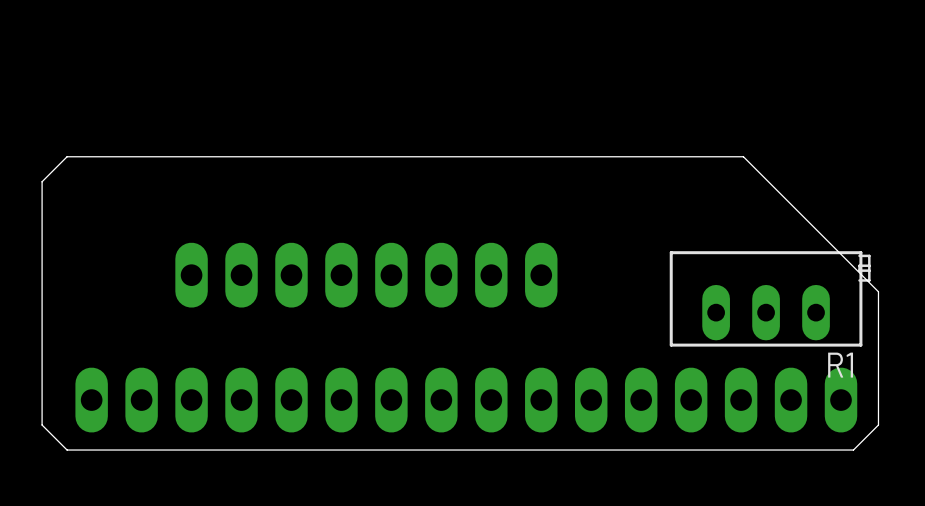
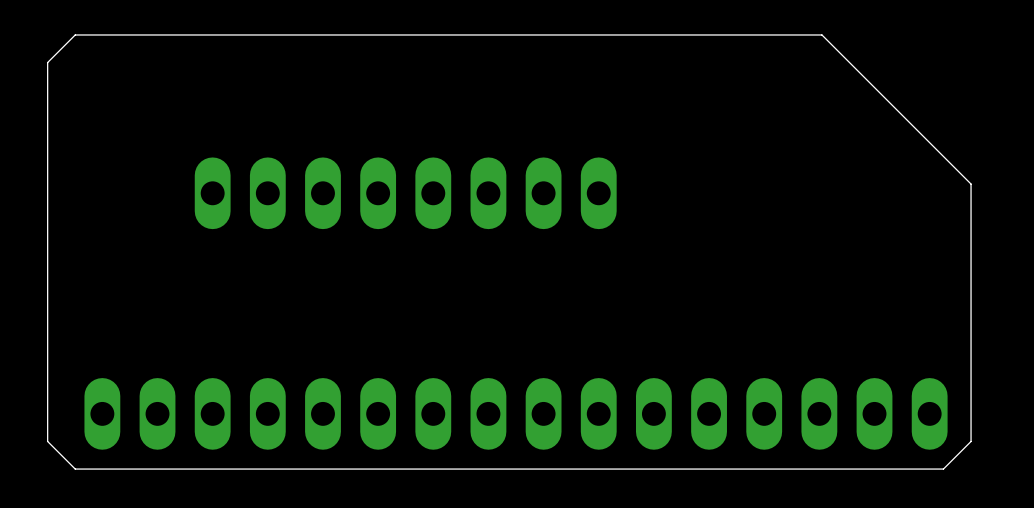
board edge: (42, 181) (67, 156) (743, 156) (878, 291) -> (47, 172) (47, 62) (75, 34) (821, 34) (971, 184) (971, 294)
part position: (366, 275) -> (405, 193)
R1: (770, 298) -> none

